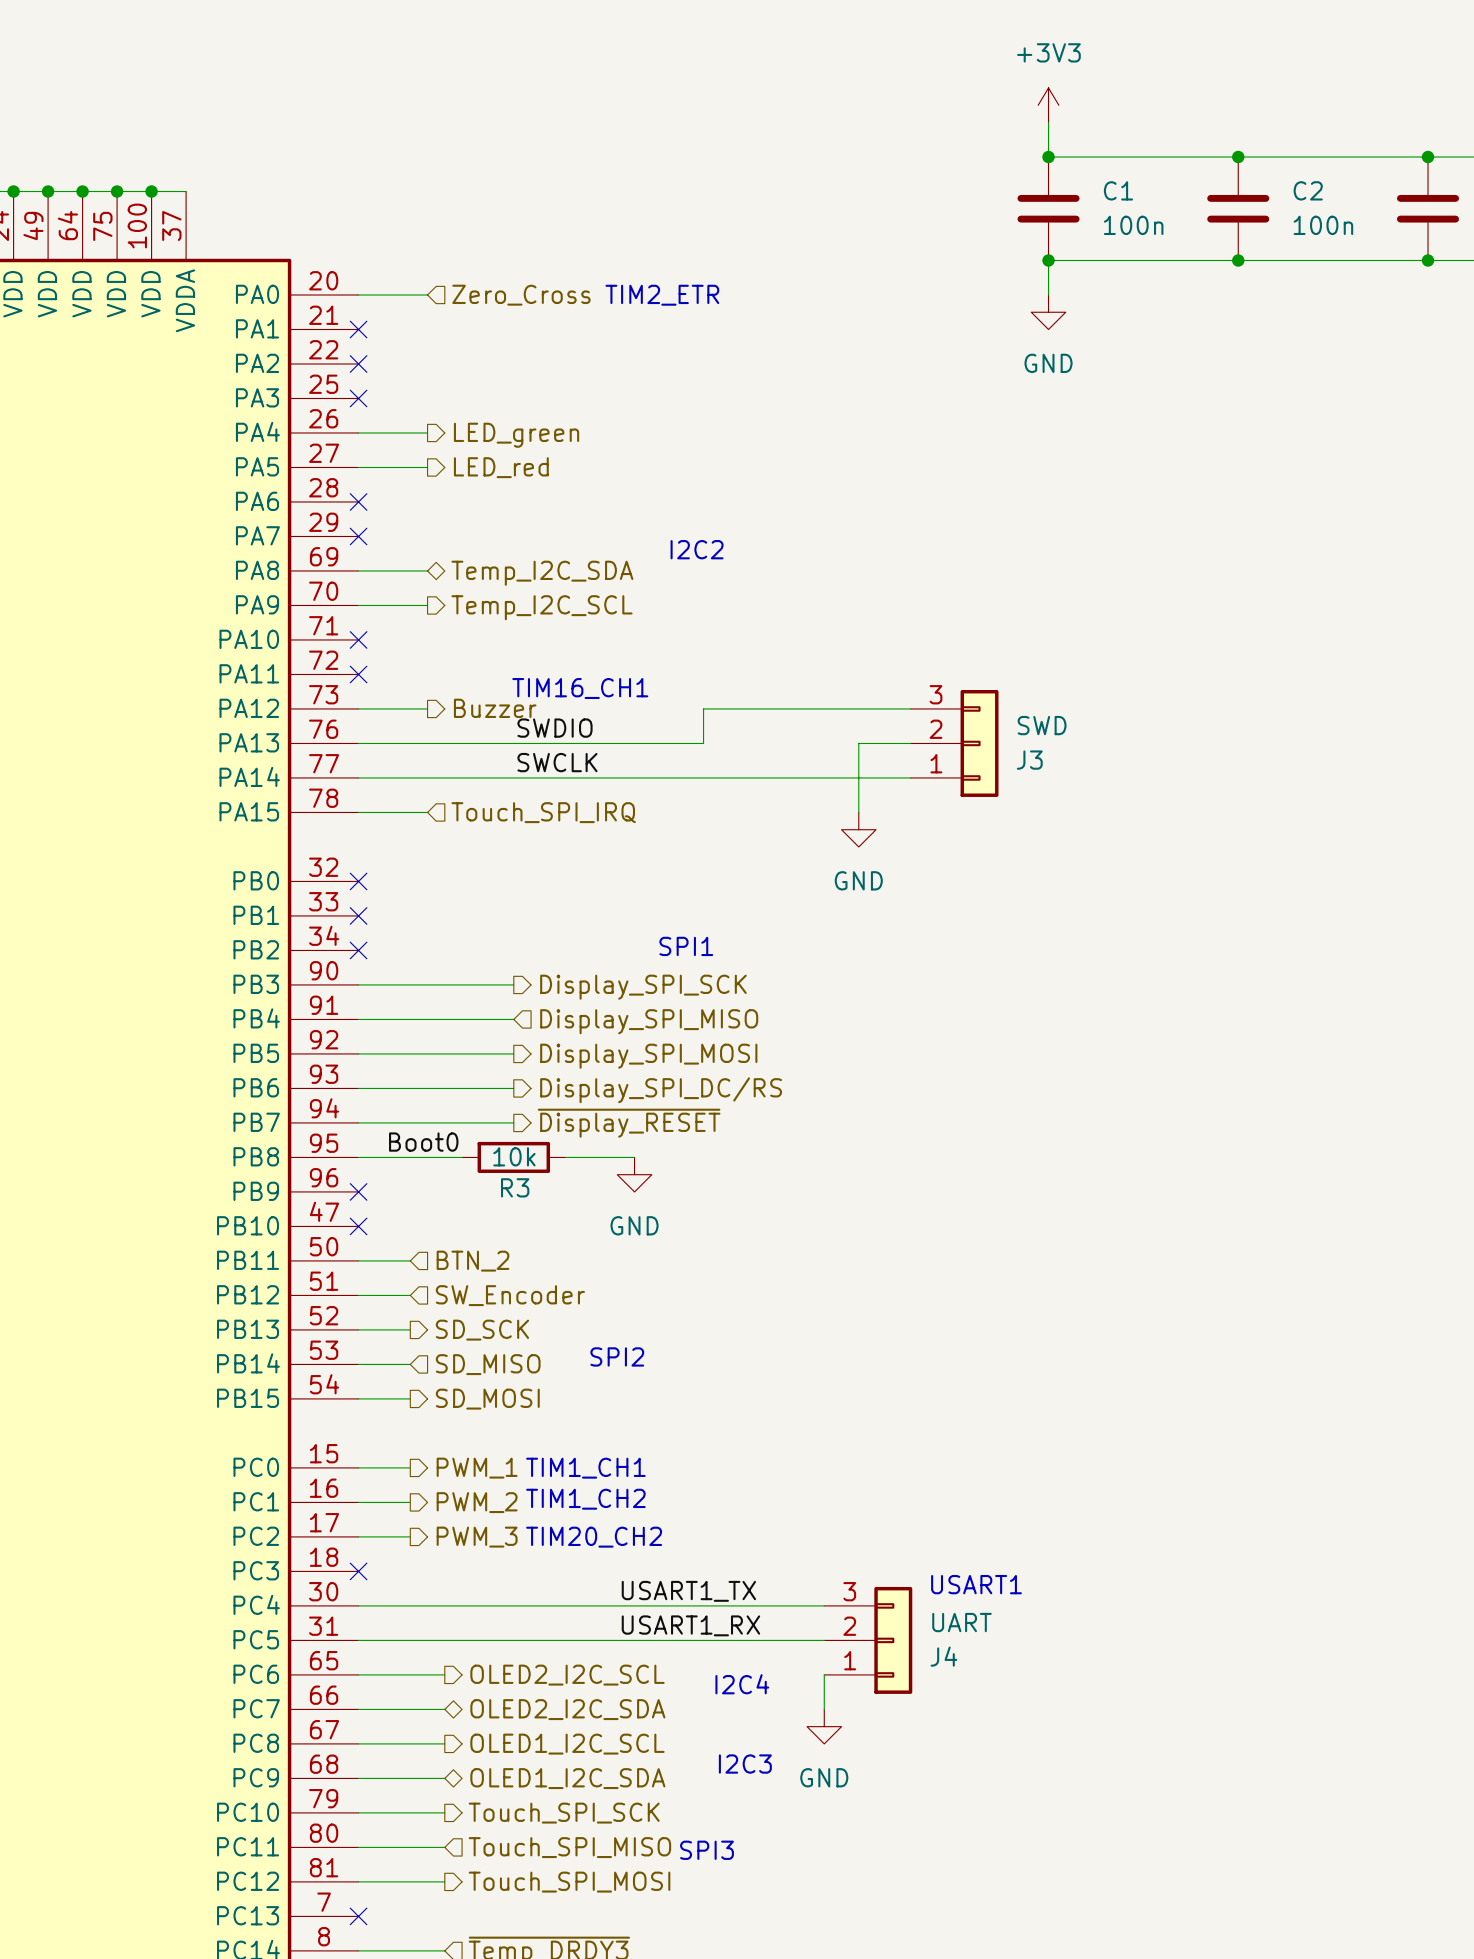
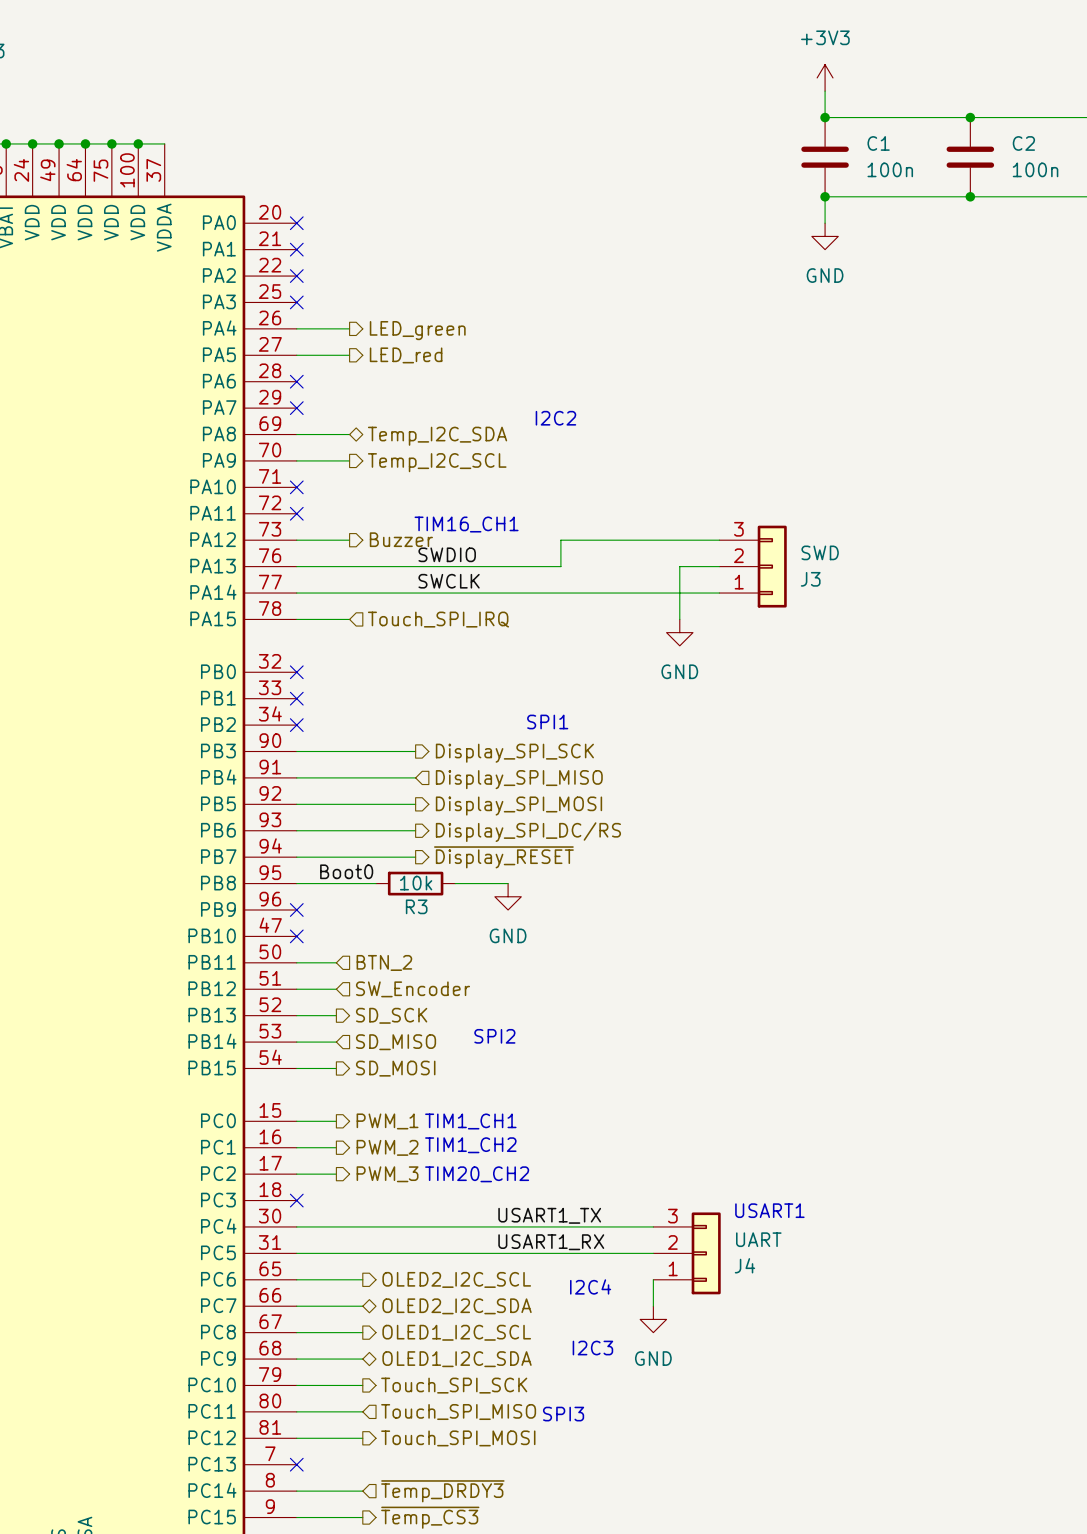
wire: (358, 295) (427, 295) -> none
no-connect mark: none -> (296, 223)
hierarchical label: Zero_Cross (521, 295) -> none
text: TIM2_ETR (662, 295) -> none

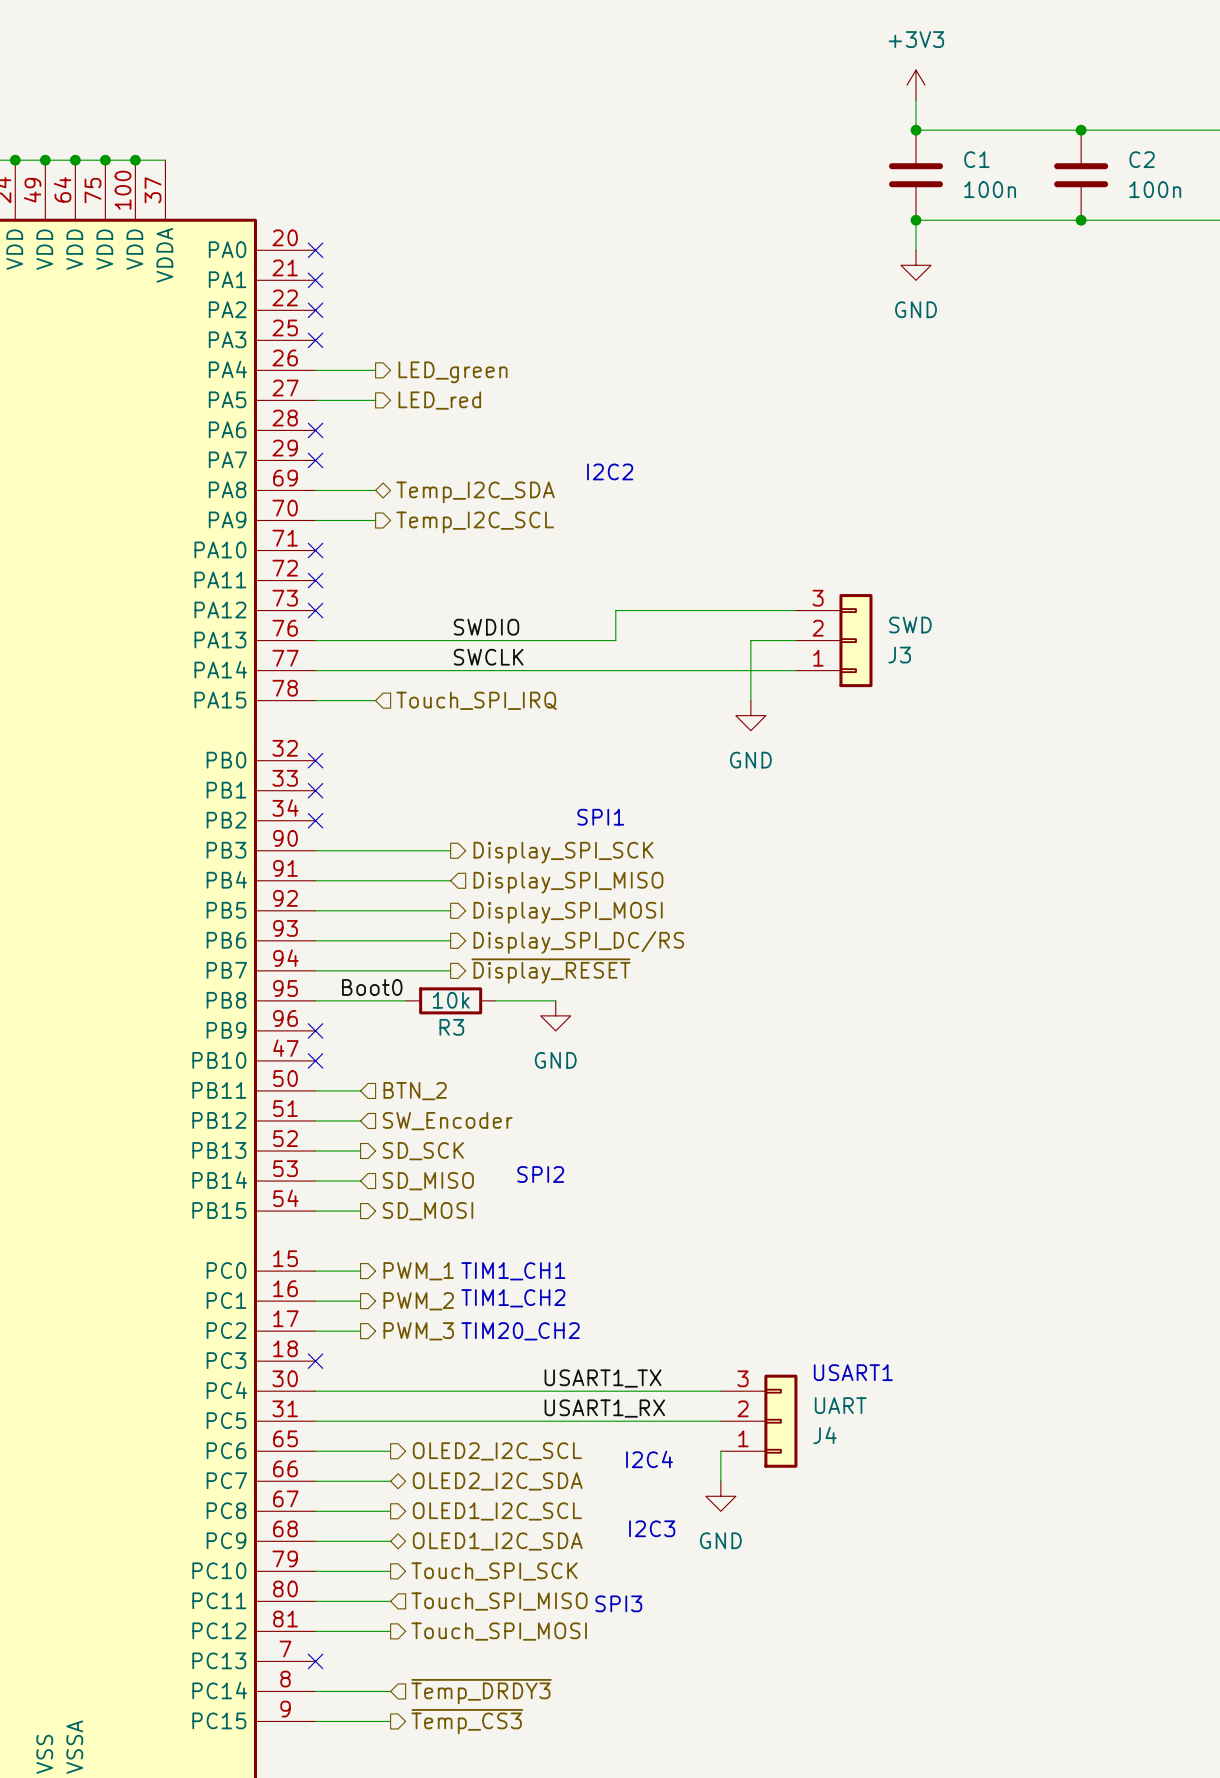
text: TIM16_CH1 (466, 524) -> none
hierarchical label: Buzzer (401, 539) -> none
wire: (296, 540) (349, 540) -> none
no-connect mark: none -> (315, 610)

